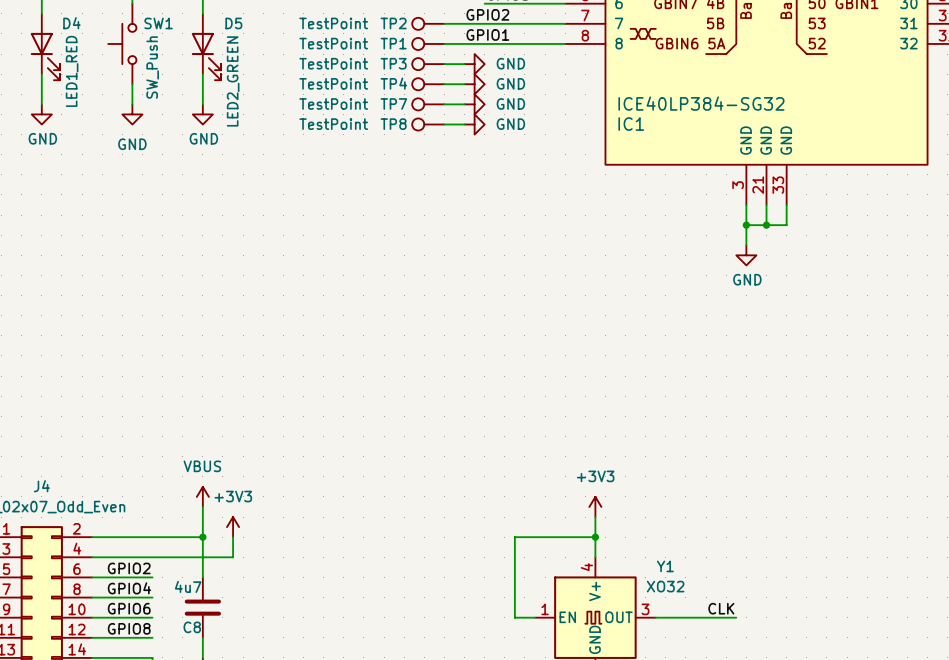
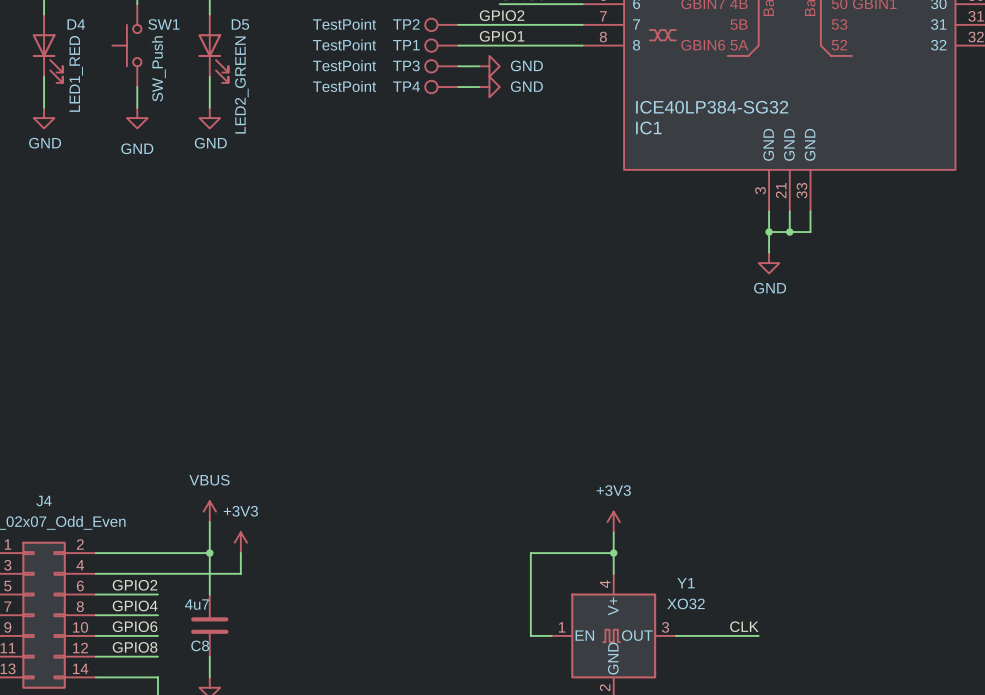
TP7: TestPoint (428, 104) -> none
wire: (444, 104) (464, 104) -> none
power symbol: GND (474, 104) -> none
TP8: TestPoint (428, 124) -> none
wire: (444, 124) (464, 124) -> none
power symbol: GND (474, 124) -> none

